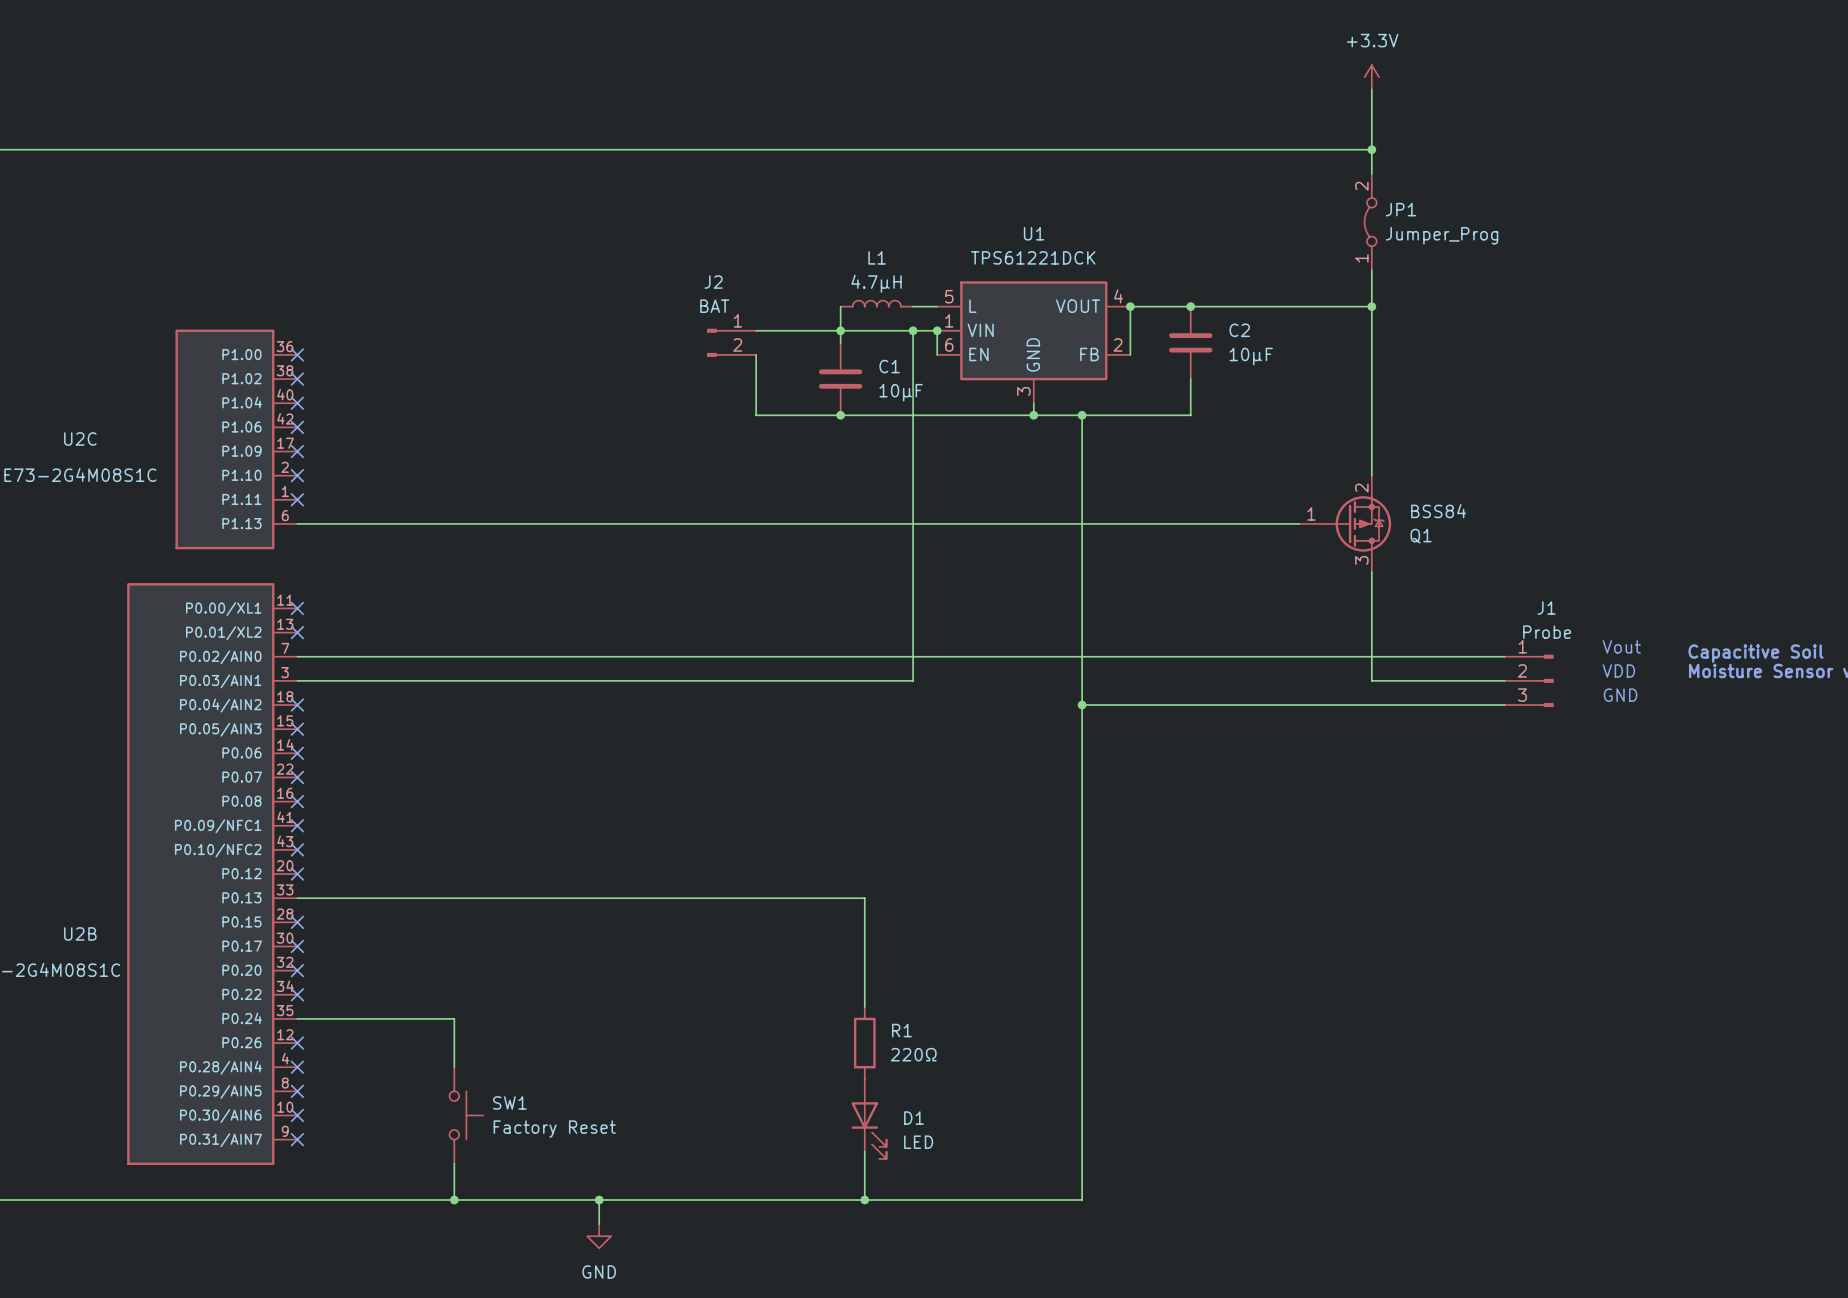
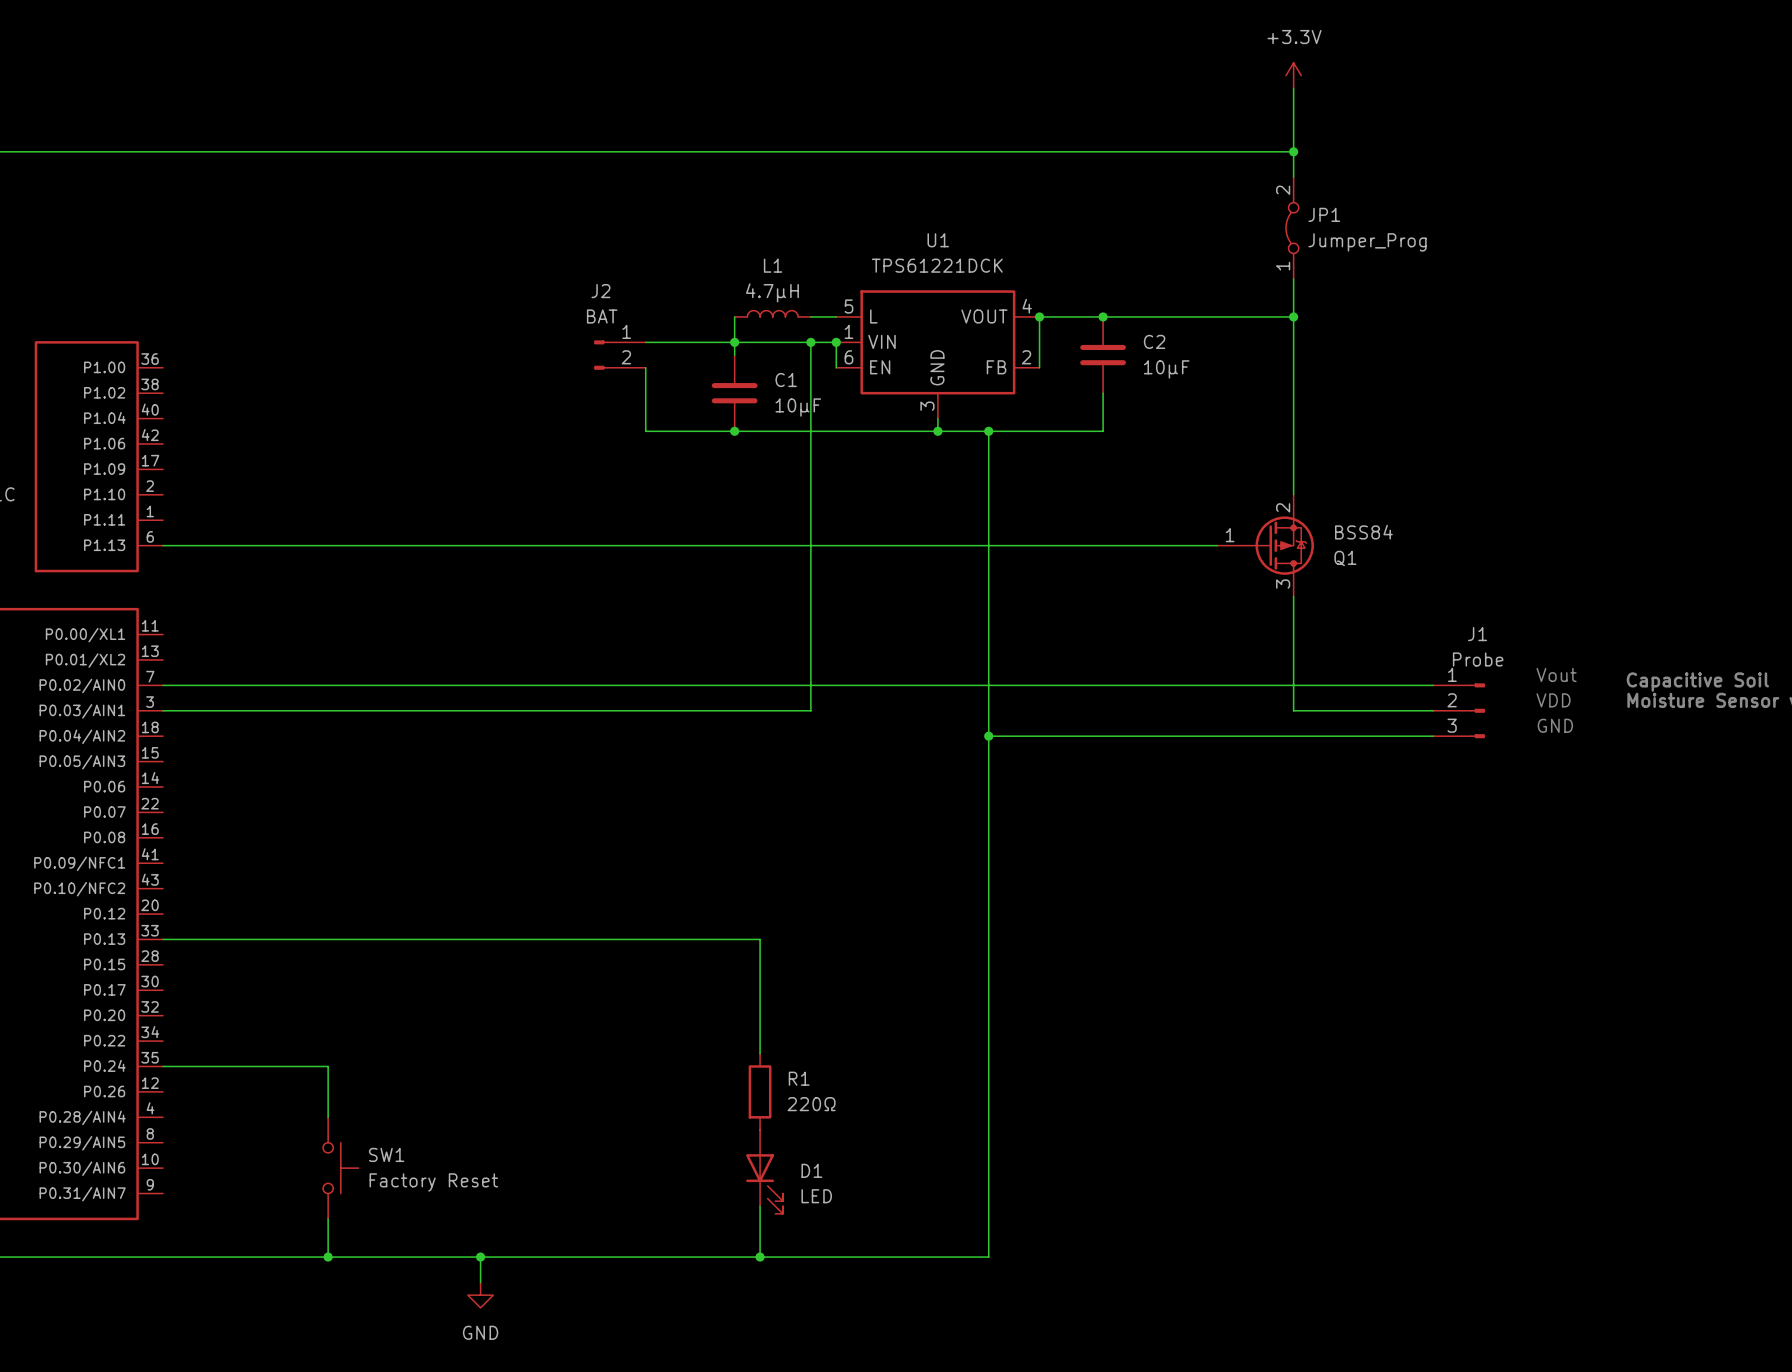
no-connect mark: (297, 354) -> none
no-connect mark: (297, 379) -> none
no-connect mark: (297, 403) -> none
no-connect mark: (297, 427) -> none
no-connect mark: (297, 451) -> none
no-connect mark: (297, 475) -> none
no-connect mark: (297, 499) -> none
no-connect mark: (297, 608) -> none
no-connect mark: (297, 632) -> none
no-connect mark: (297, 705) -> none
no-connect mark: (297, 729) -> none
no-connect mark: (297, 753) -> none
no-connect mark: (297, 777) -> none
no-connect mark: (297, 801) -> none
no-connect mark: (297, 825) -> none
no-connect mark: (297, 849) -> none
no-connect mark: (297, 874) -> none
no-connect mark: (297, 922) -> none
no-connect mark: (297, 946) -> none
no-connect mark: (297, 970) -> none
no-connect mark: (297, 994) -> none
no-connect mark: (297, 1043) -> none
no-connect mark: (297, 1067) -> none
no-connect mark: (297, 1091) -> none
no-connect mark: (297, 1115) -> none
no-connect mark: (297, 1139) -> none

